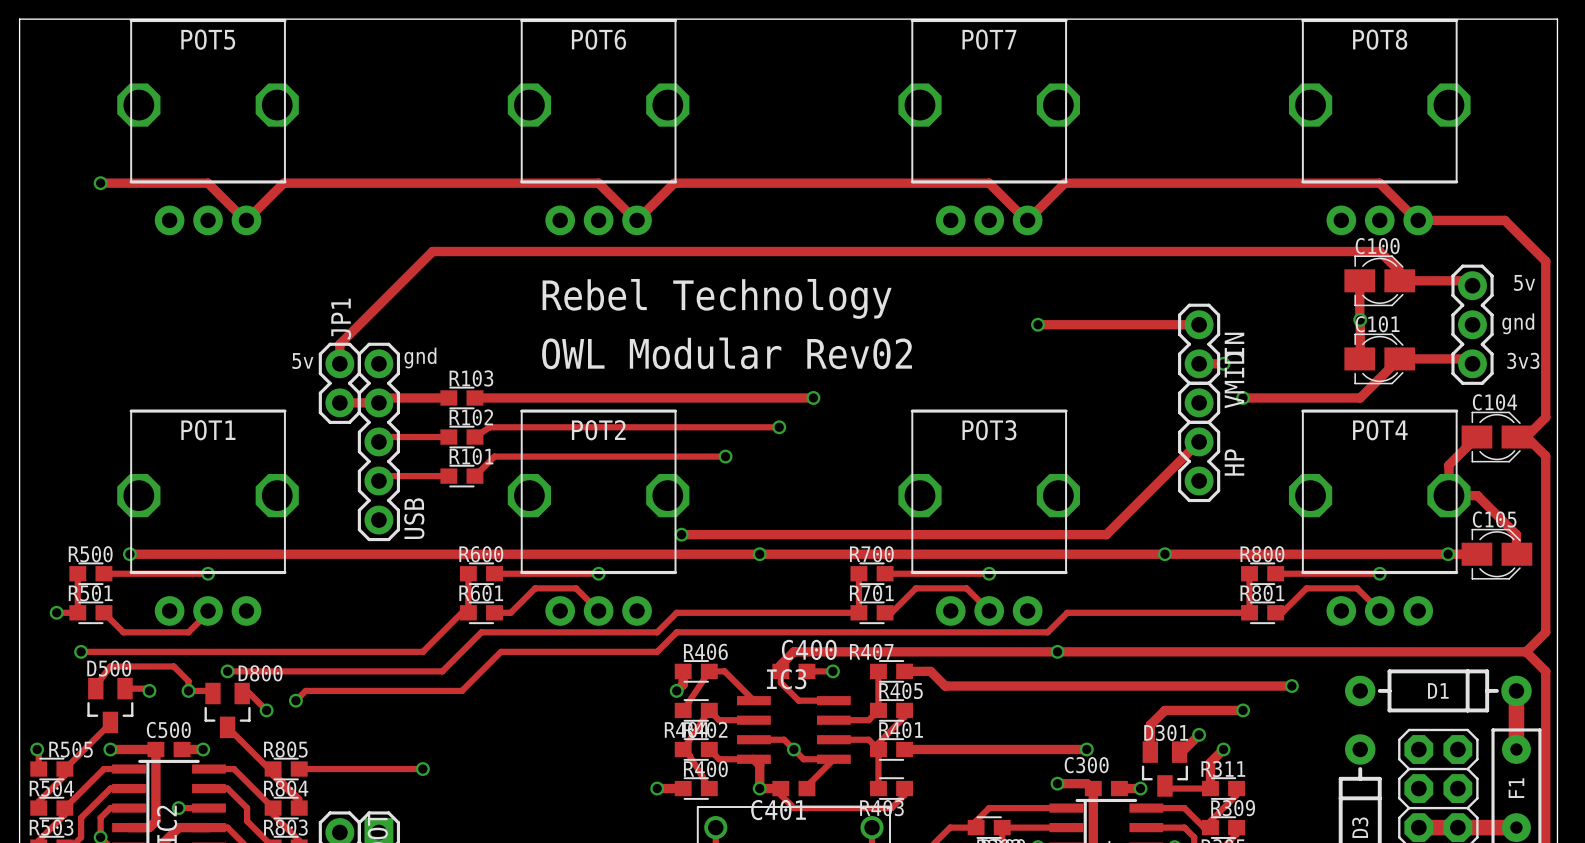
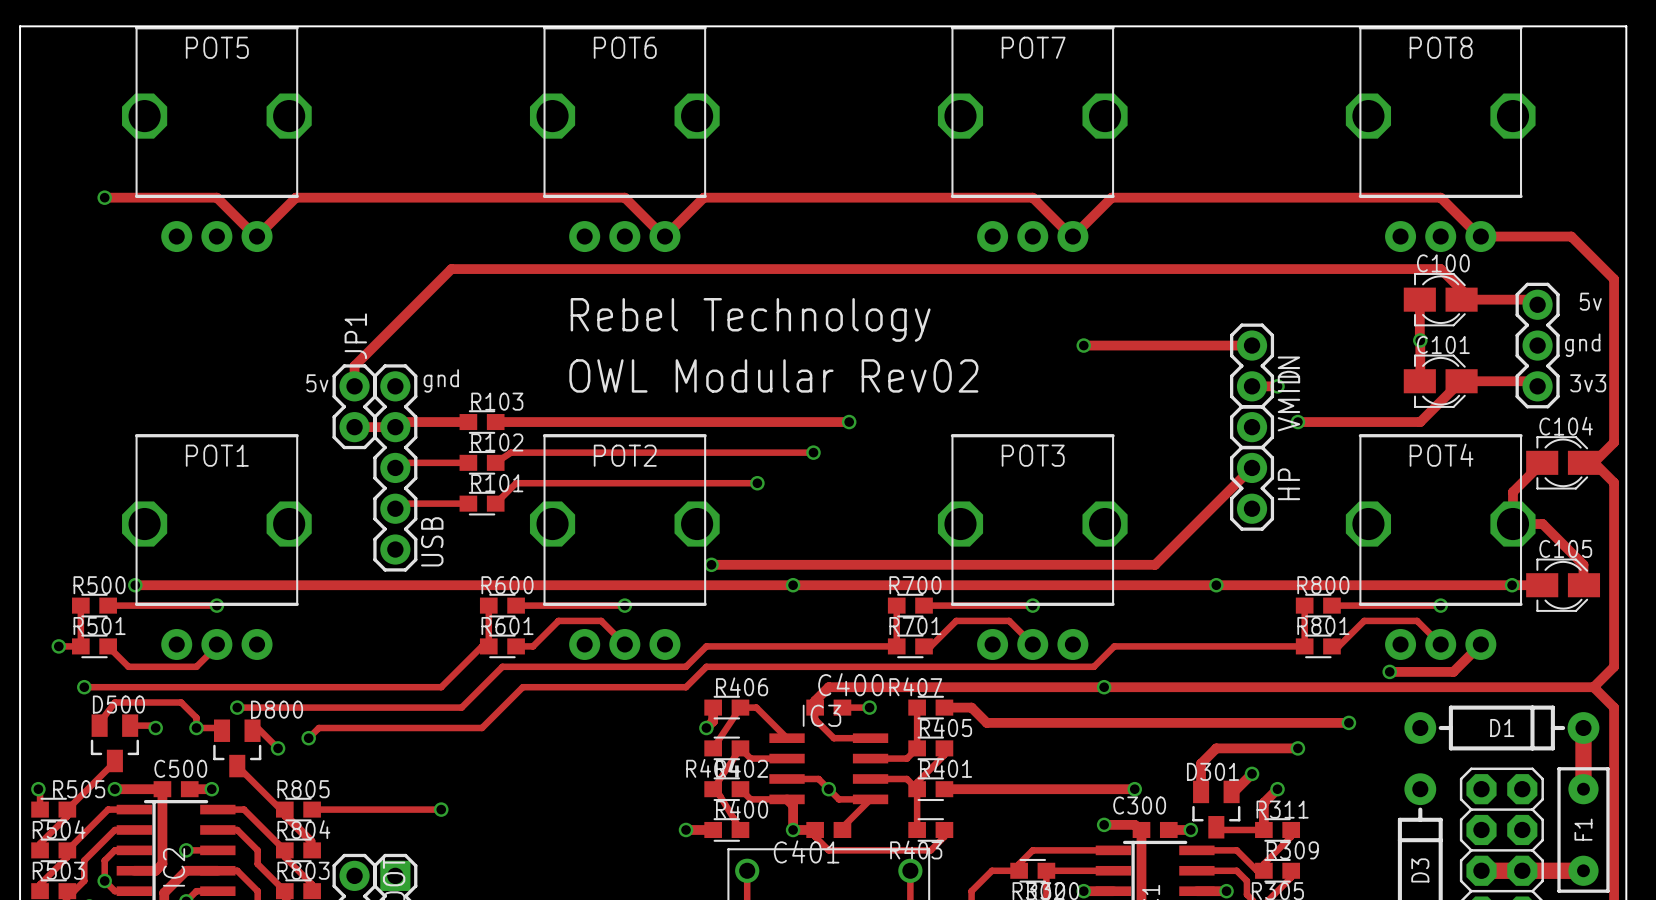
track: none -> (1480, 644) (1453, 671) (1389, 671)
via: none -> (1389, 671)

